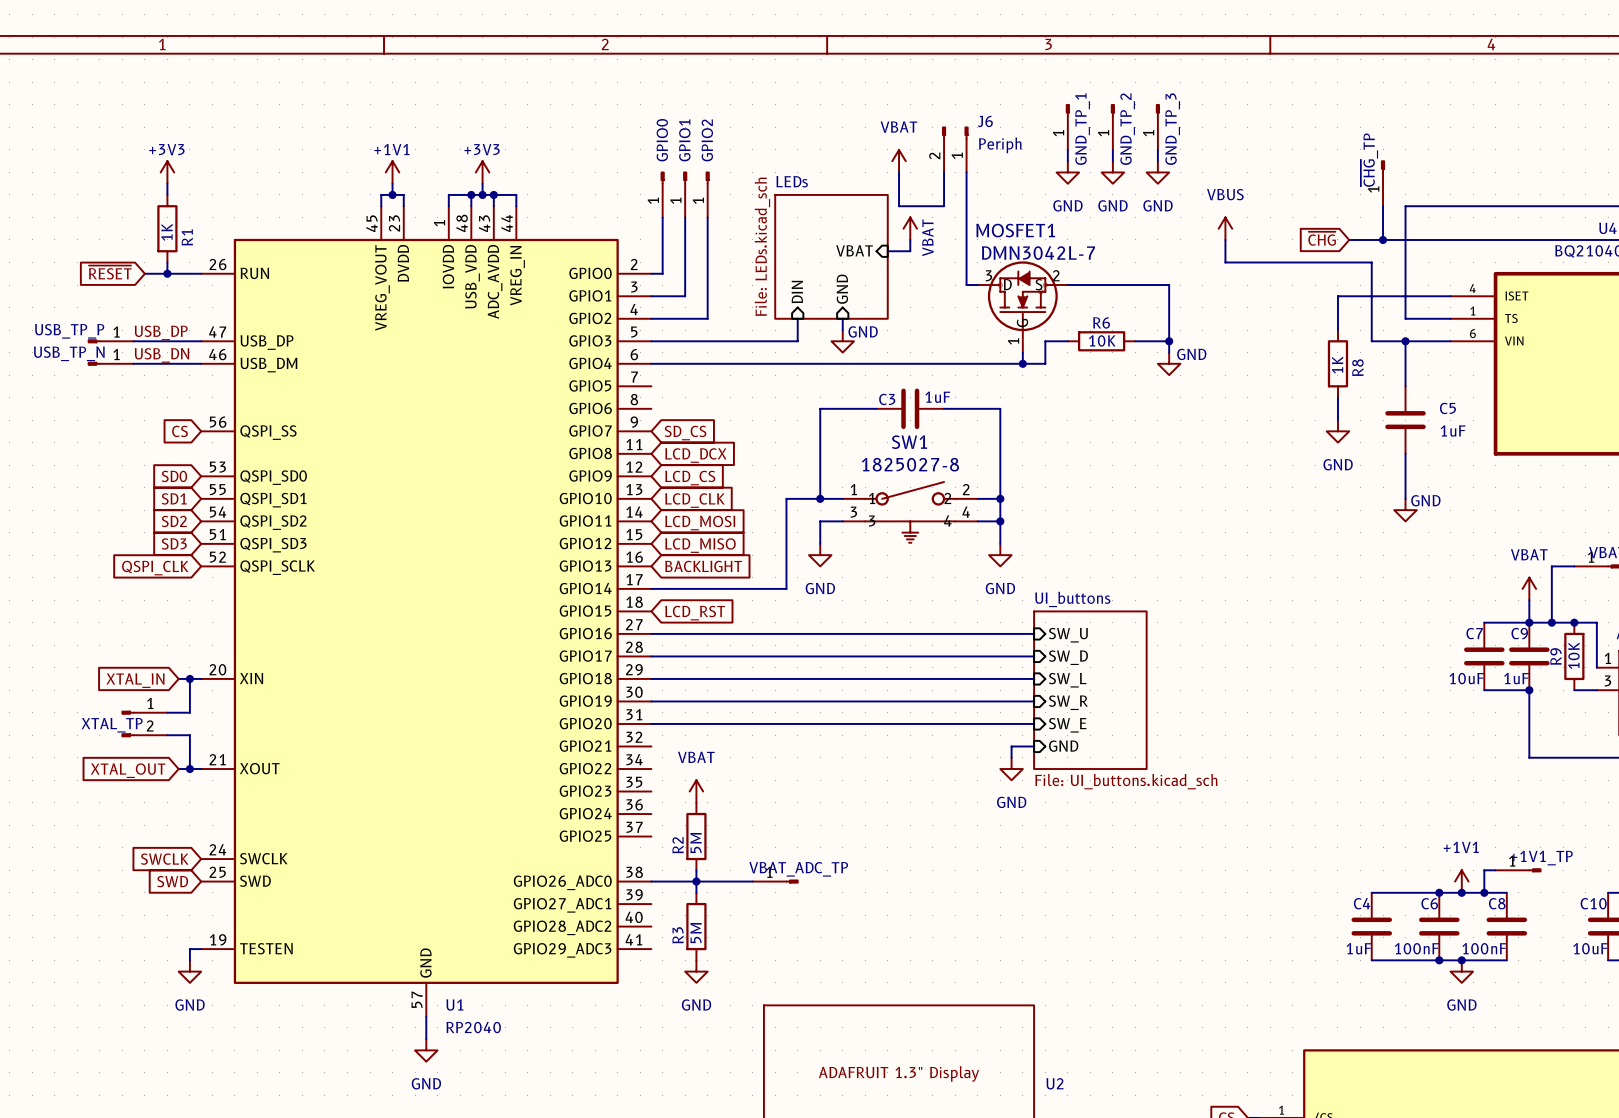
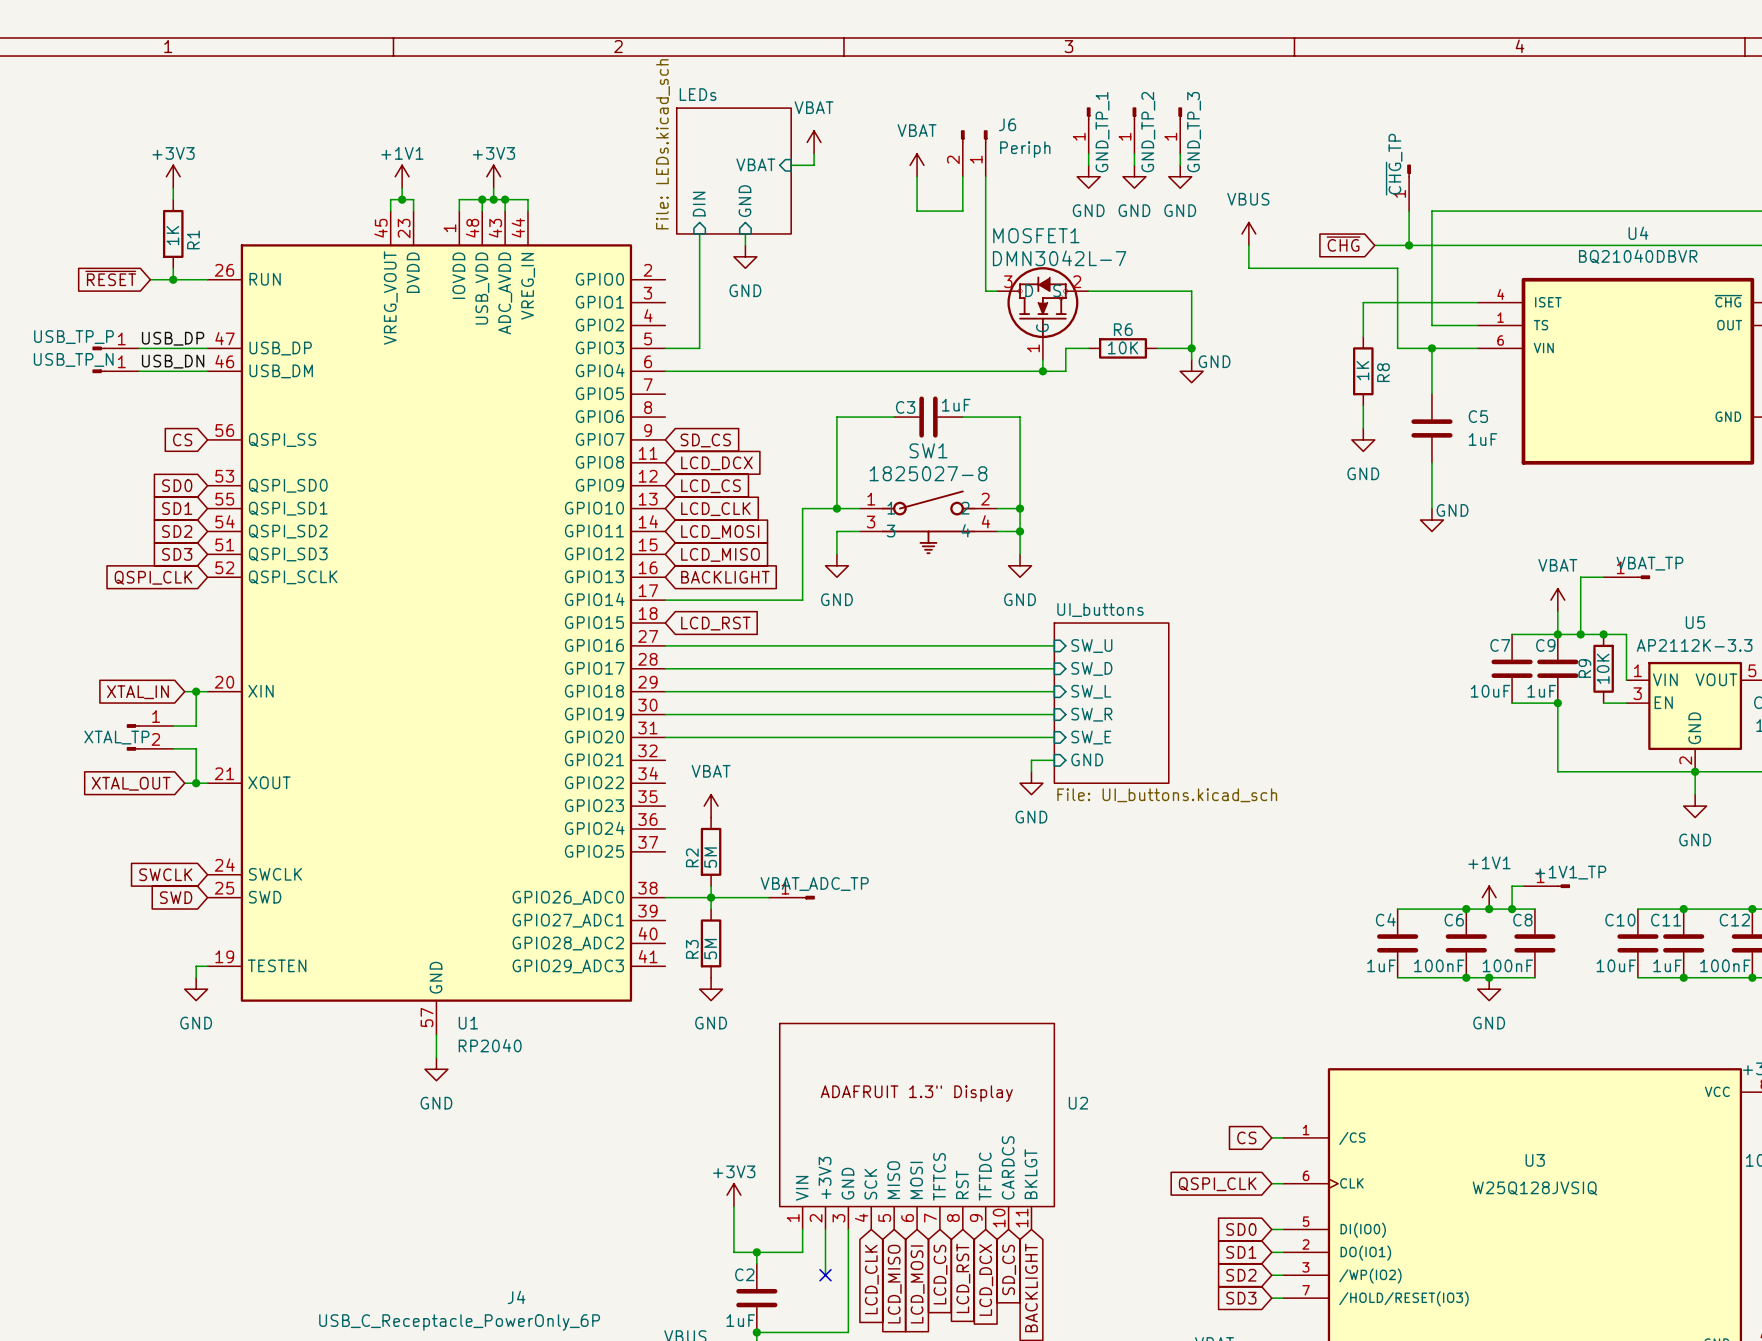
part: GPIO0 (662, 194) -> none
part: GPIO1 (685, 194) -> none
part: GPIO2 (707, 194) -> none
wire: (662, 217) (662, 273) (651, 273) -> none
wire: (685, 217) (685, 228) -> none
wire: (707, 217) (707, 318) (651, 318) -> none
power symbol position: VBAT (910, 228) -> VBAT (814, 142)
power symbol text rotation: 0° (927, 237) -> 90° clockwise (814, 107)
wire: (910, 239) (910, 251) (887, 251) -> (814, 153) (814, 165) (791, 165)
sheet pin position: VBAT (854, 250) -> VBAT (755, 164)
sheet LEDs position: (831, 256) -> (733, 171)
sheet pin position: GND (842, 289) -> GND (744, 201)
sheet pin position: DIN (797, 292) -> DIN (699, 204)
wire: (651, 296) (685, 296) -> (699, 348) (699, 302)
wire: (797, 318) (797, 341) (685, 341) -> none
wire: (842, 318) (842, 330) -> (745, 233) (745, 245)
power symbol text position: GND (863, 331) -> GND (745, 290)
power symbol position: GND (842, 341) -> GND (745, 256)

